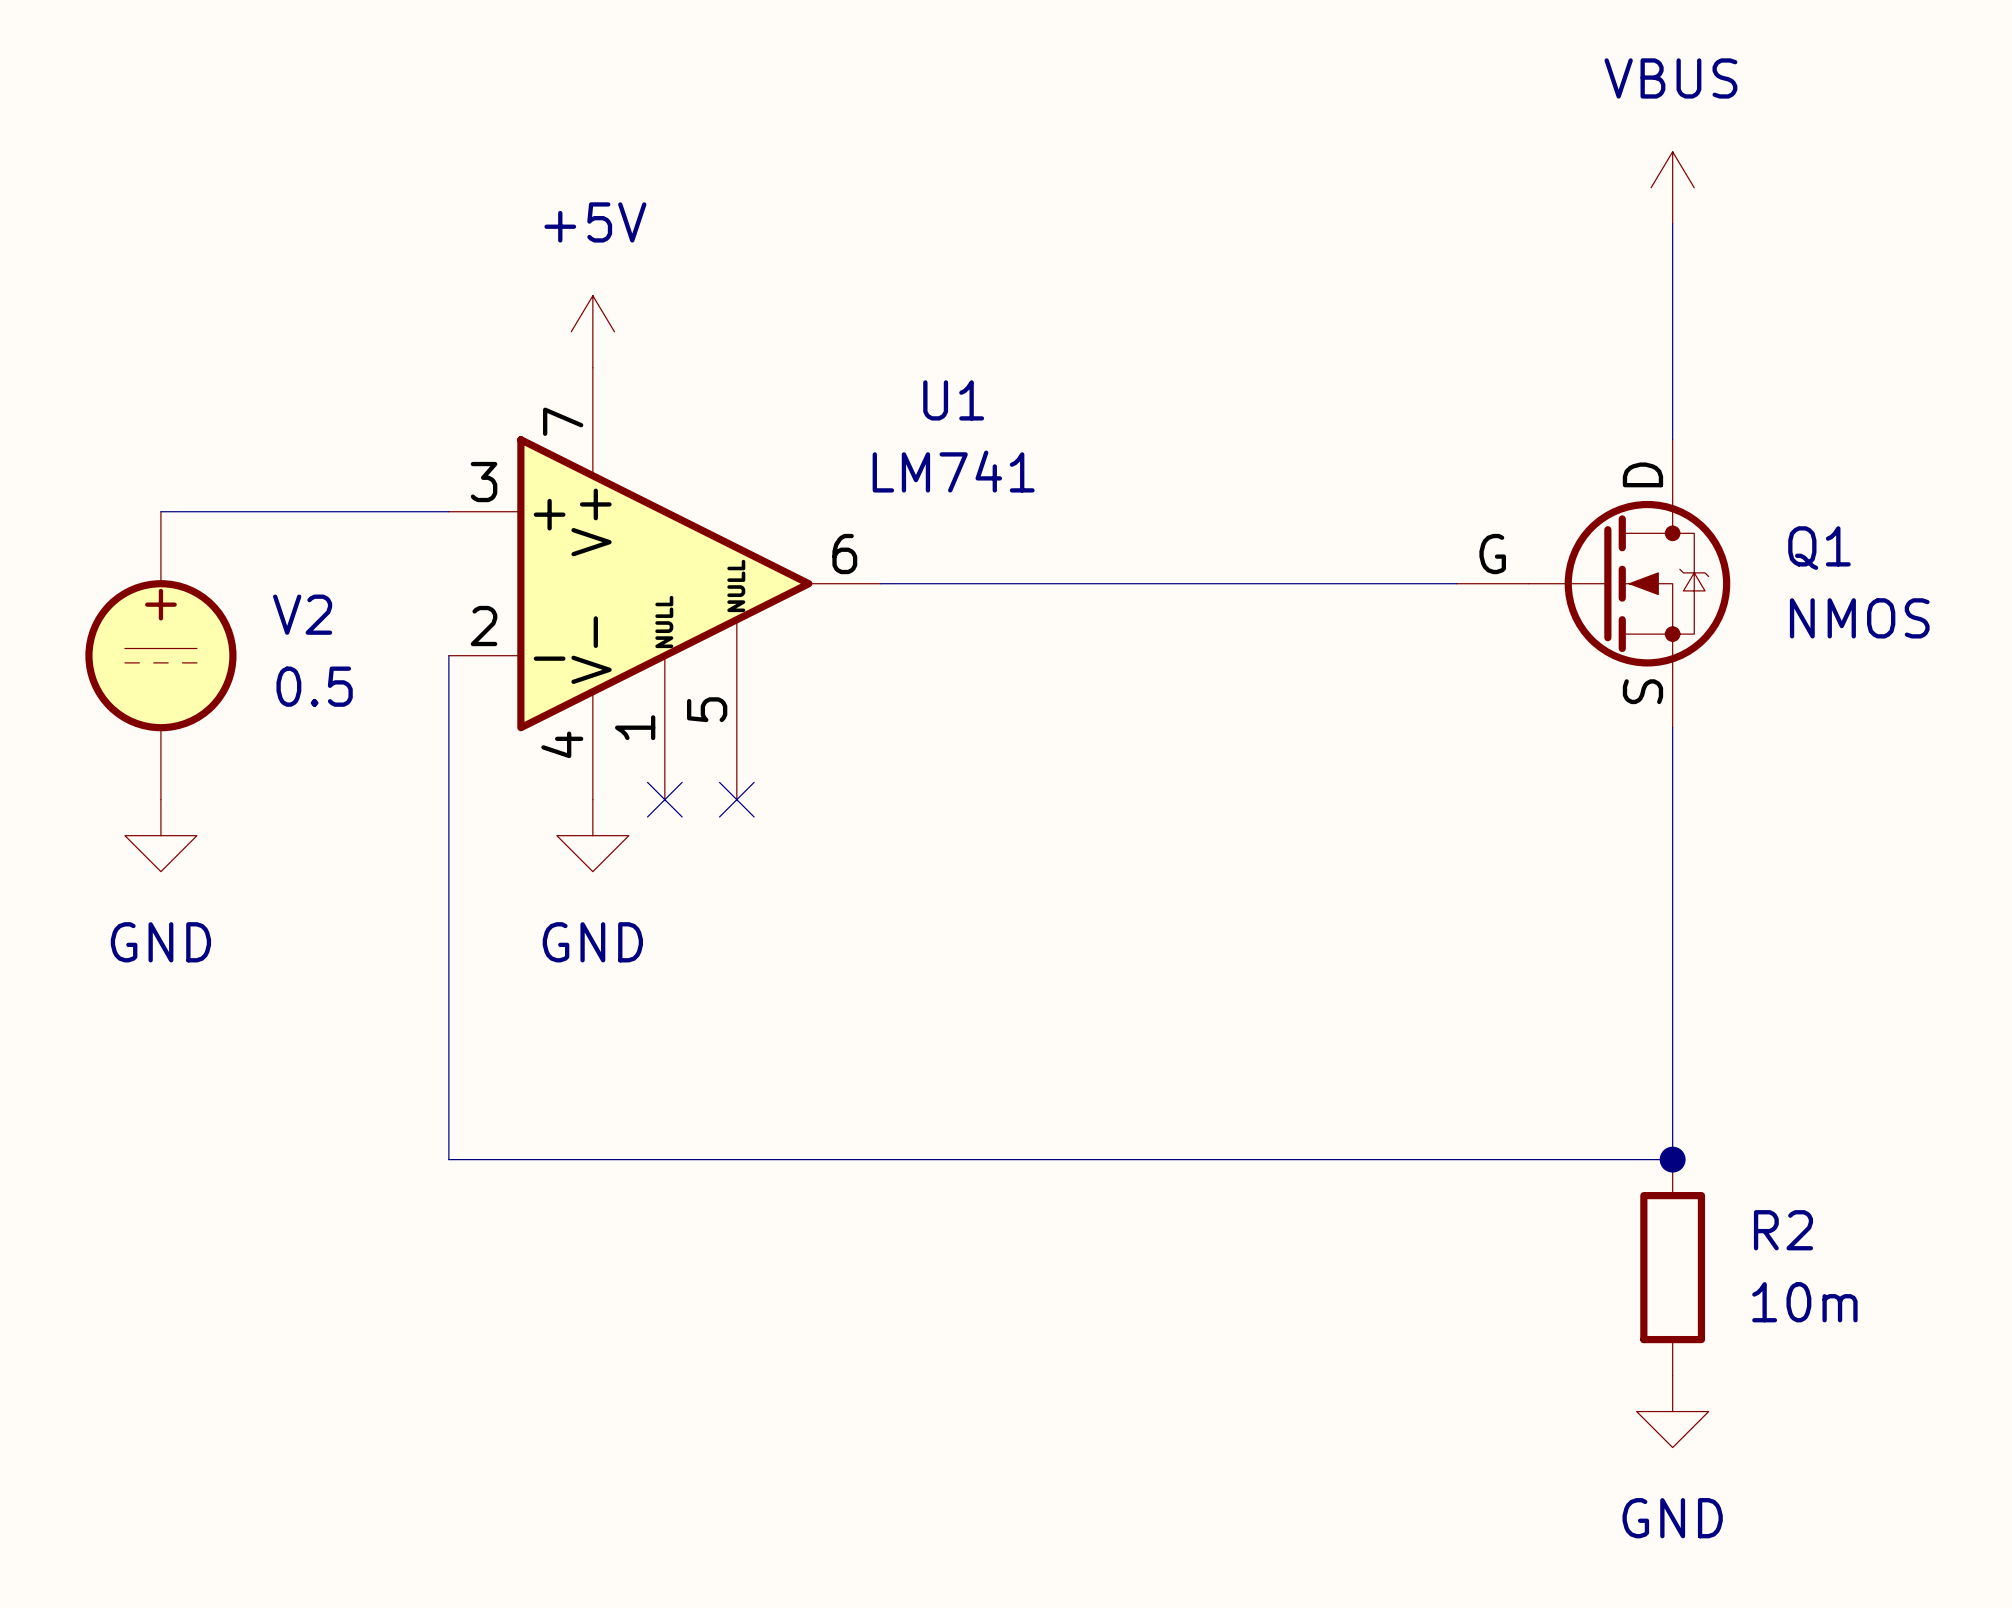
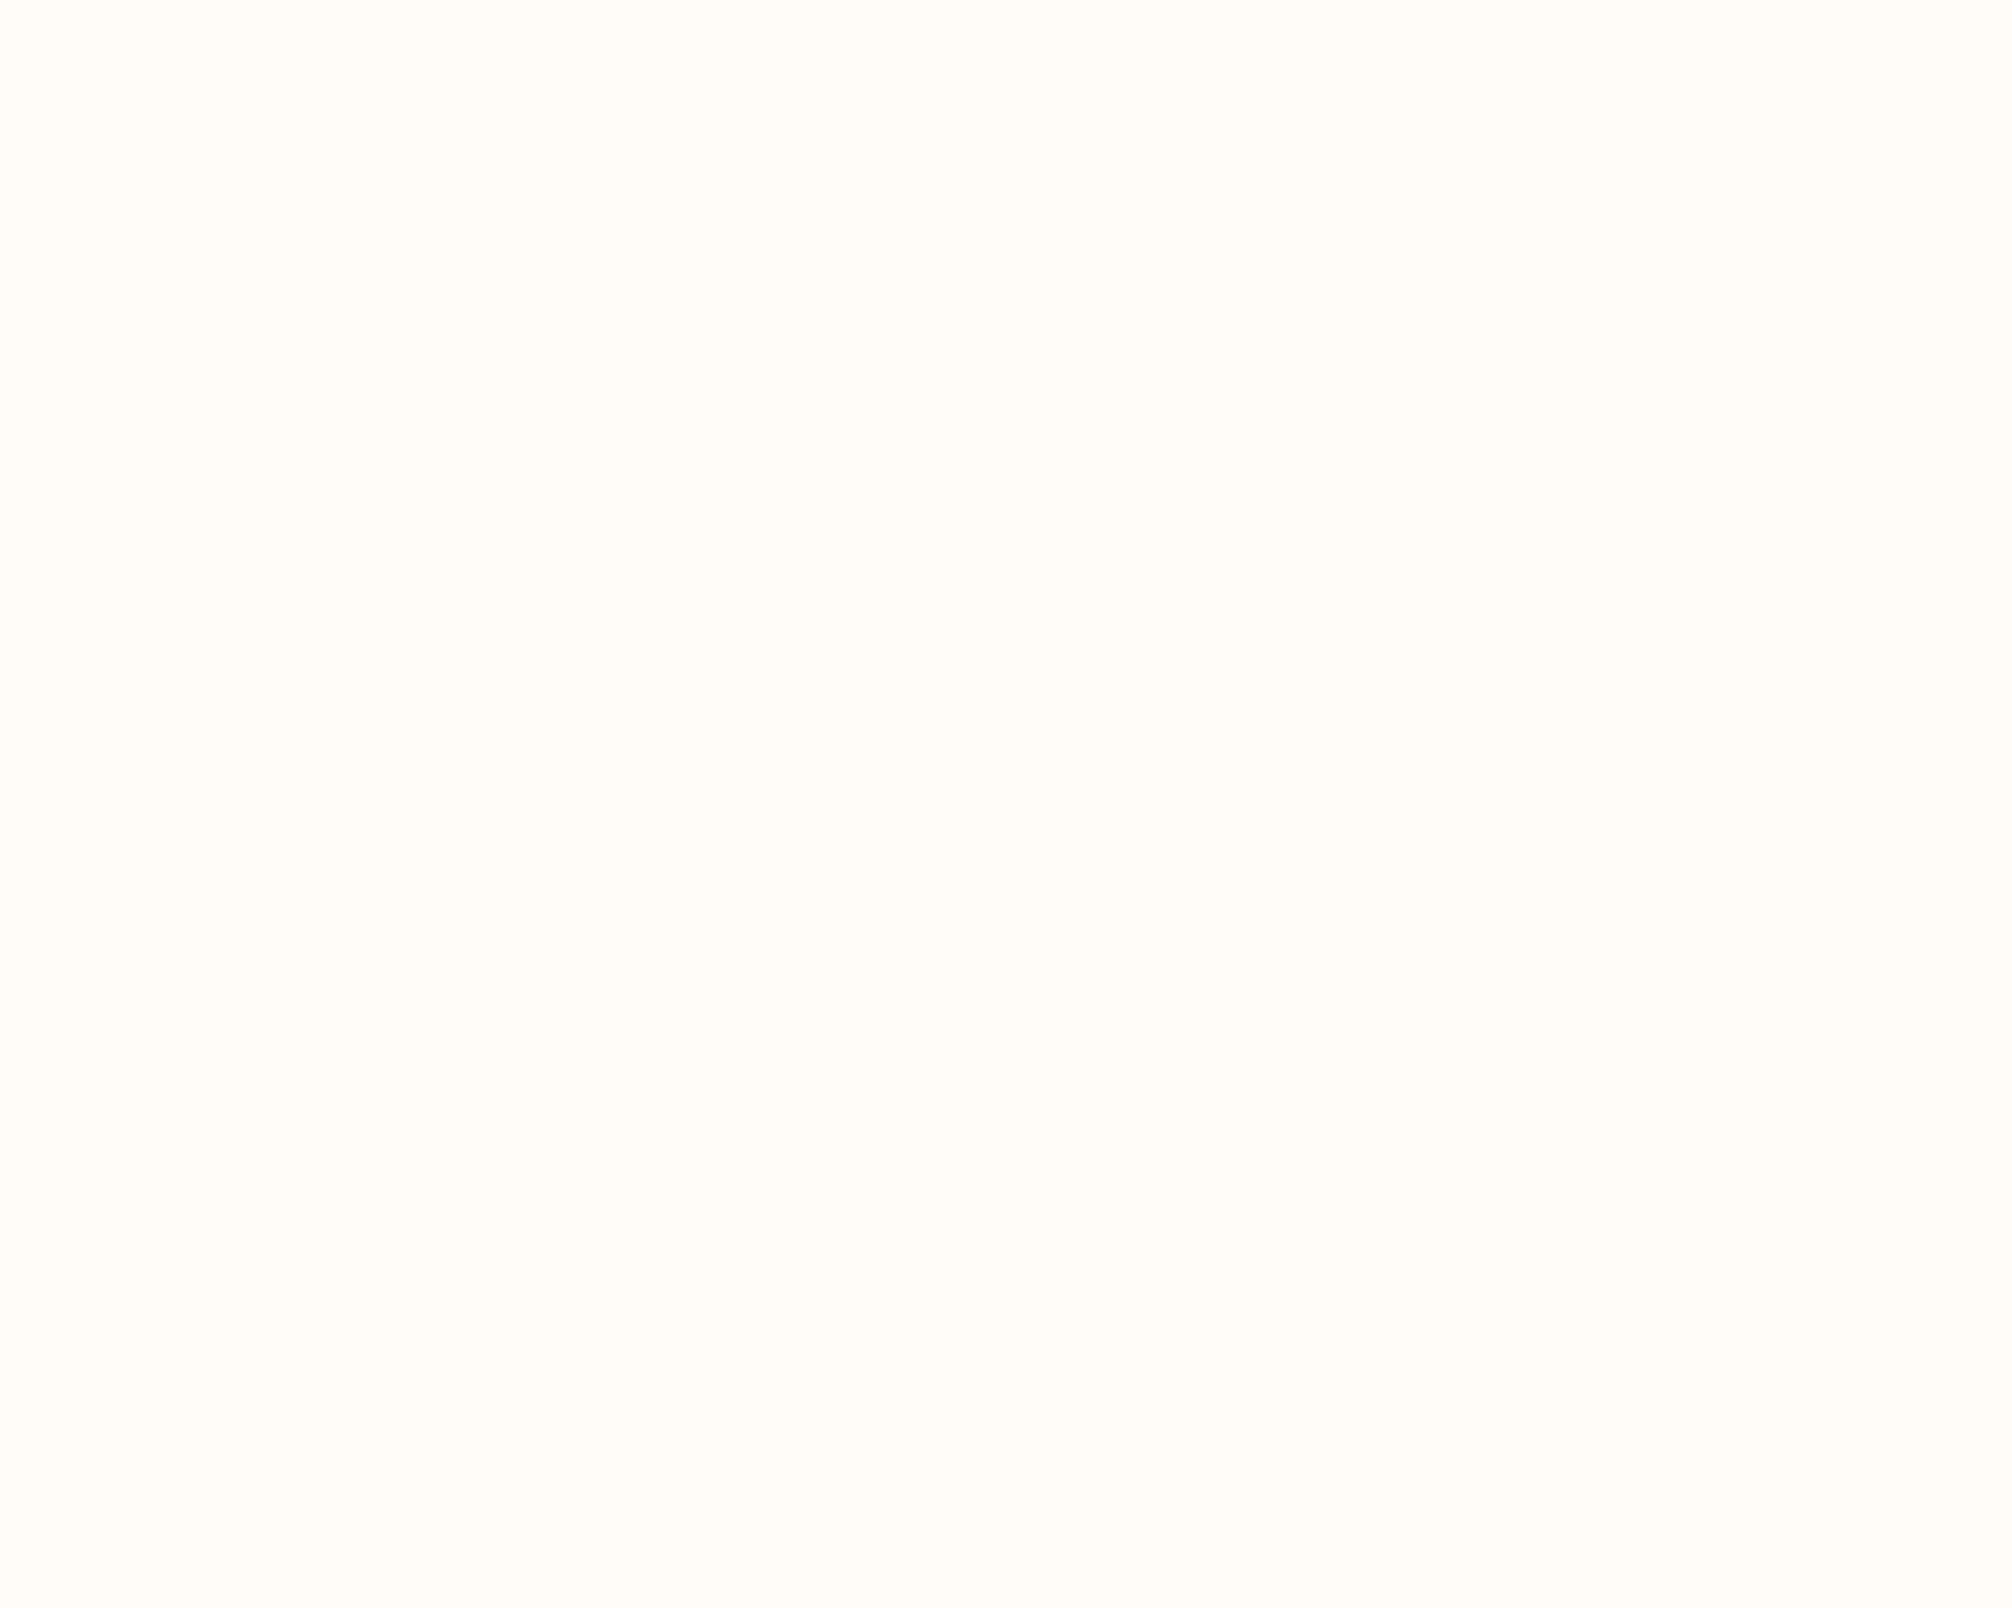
power symbol: VBUS (1672, 187) -> none
wire: (1672, 223) (1672, 439) -> none
power symbol: +5V (592, 331) -> none
wire: (160, 511) (448, 511) -> none
U1: LM741 (664, 583) -> none
wire: (880, 583) (1456, 583) -> none
Q1: NMOS (1593, 583) -> none
V2: 0.5 (160, 655) -> none
wire: (448, 655) (448, 1159) (1672, 1159) (1672, 727) -> none
no-connect mark: (664, 799) -> none
no-connect mark: (736, 799) -> none
power symbol: GND (160, 835) -> none
power symbol: GND (592, 835) -> none
junction: (1672, 1159) -> none
R2: 10m (1672, 1267) -> none
power symbol: GND (1672, 1411) -> none

